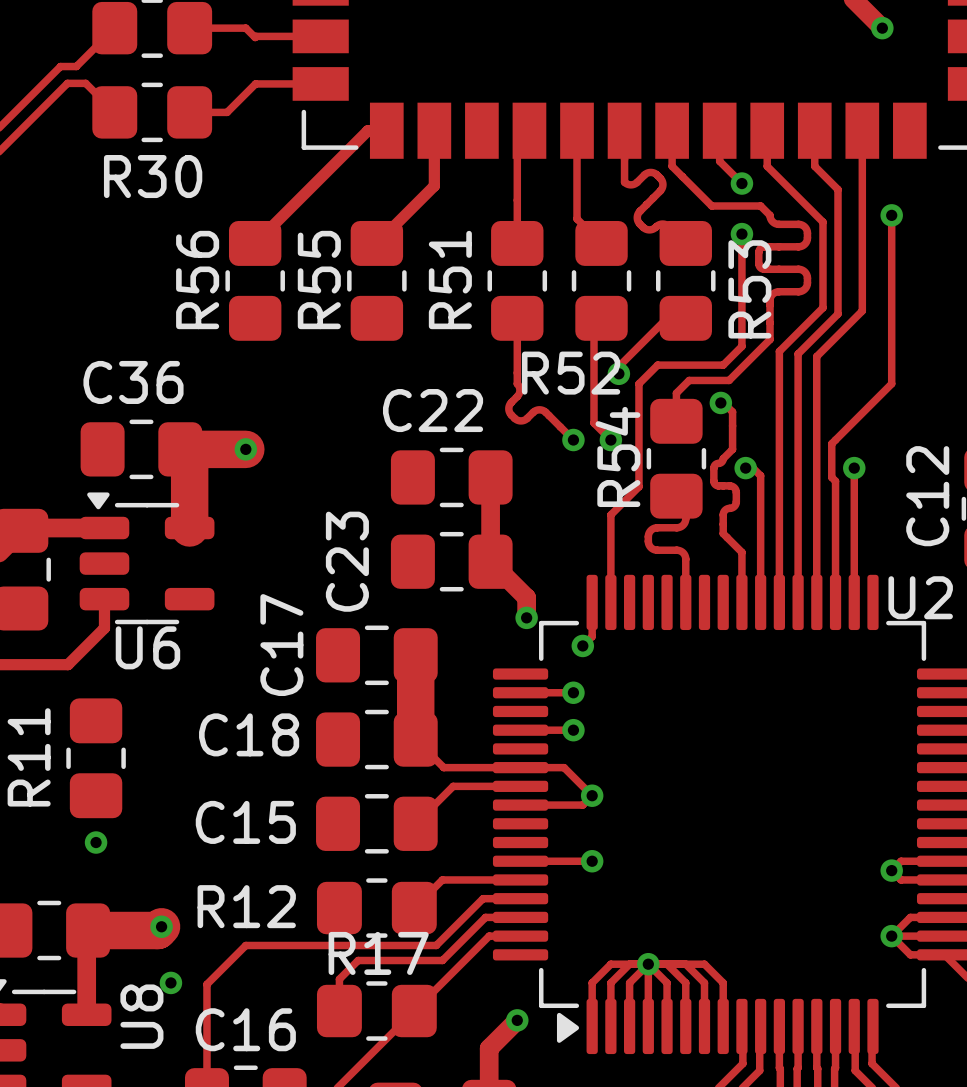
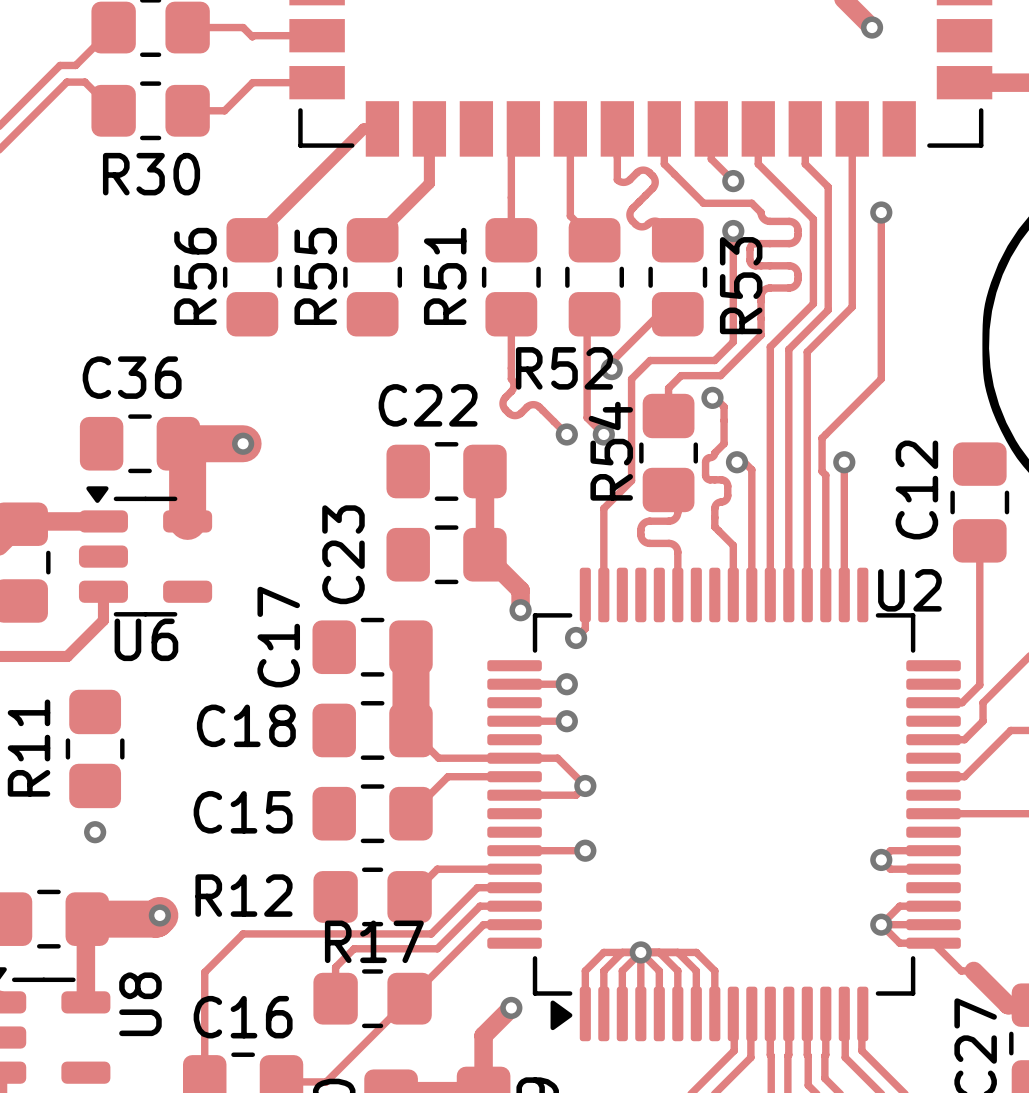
via: (170, 982) -> none

